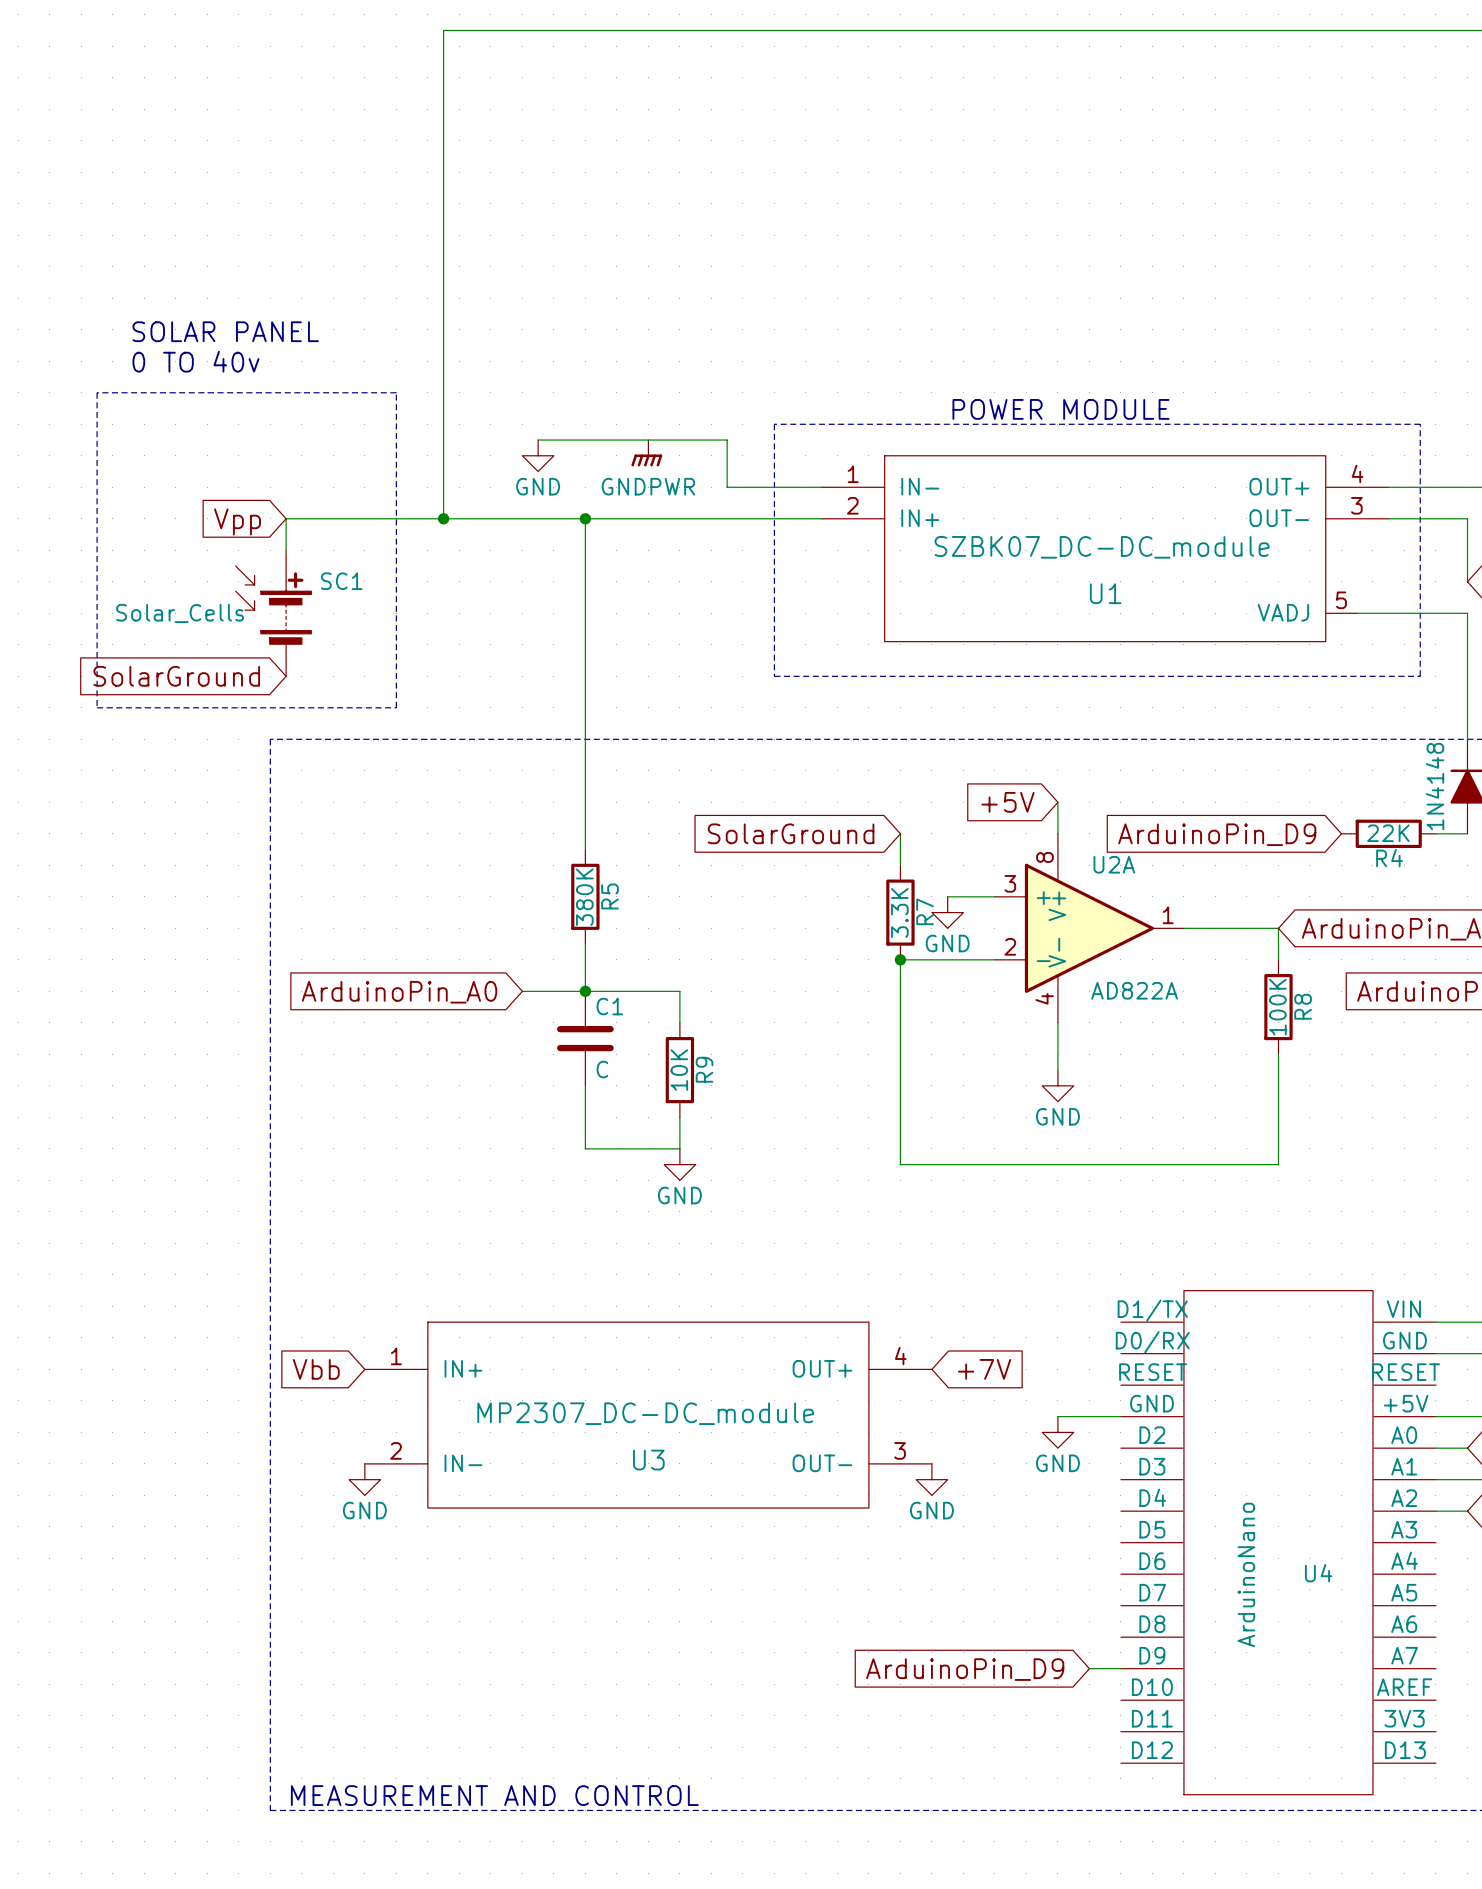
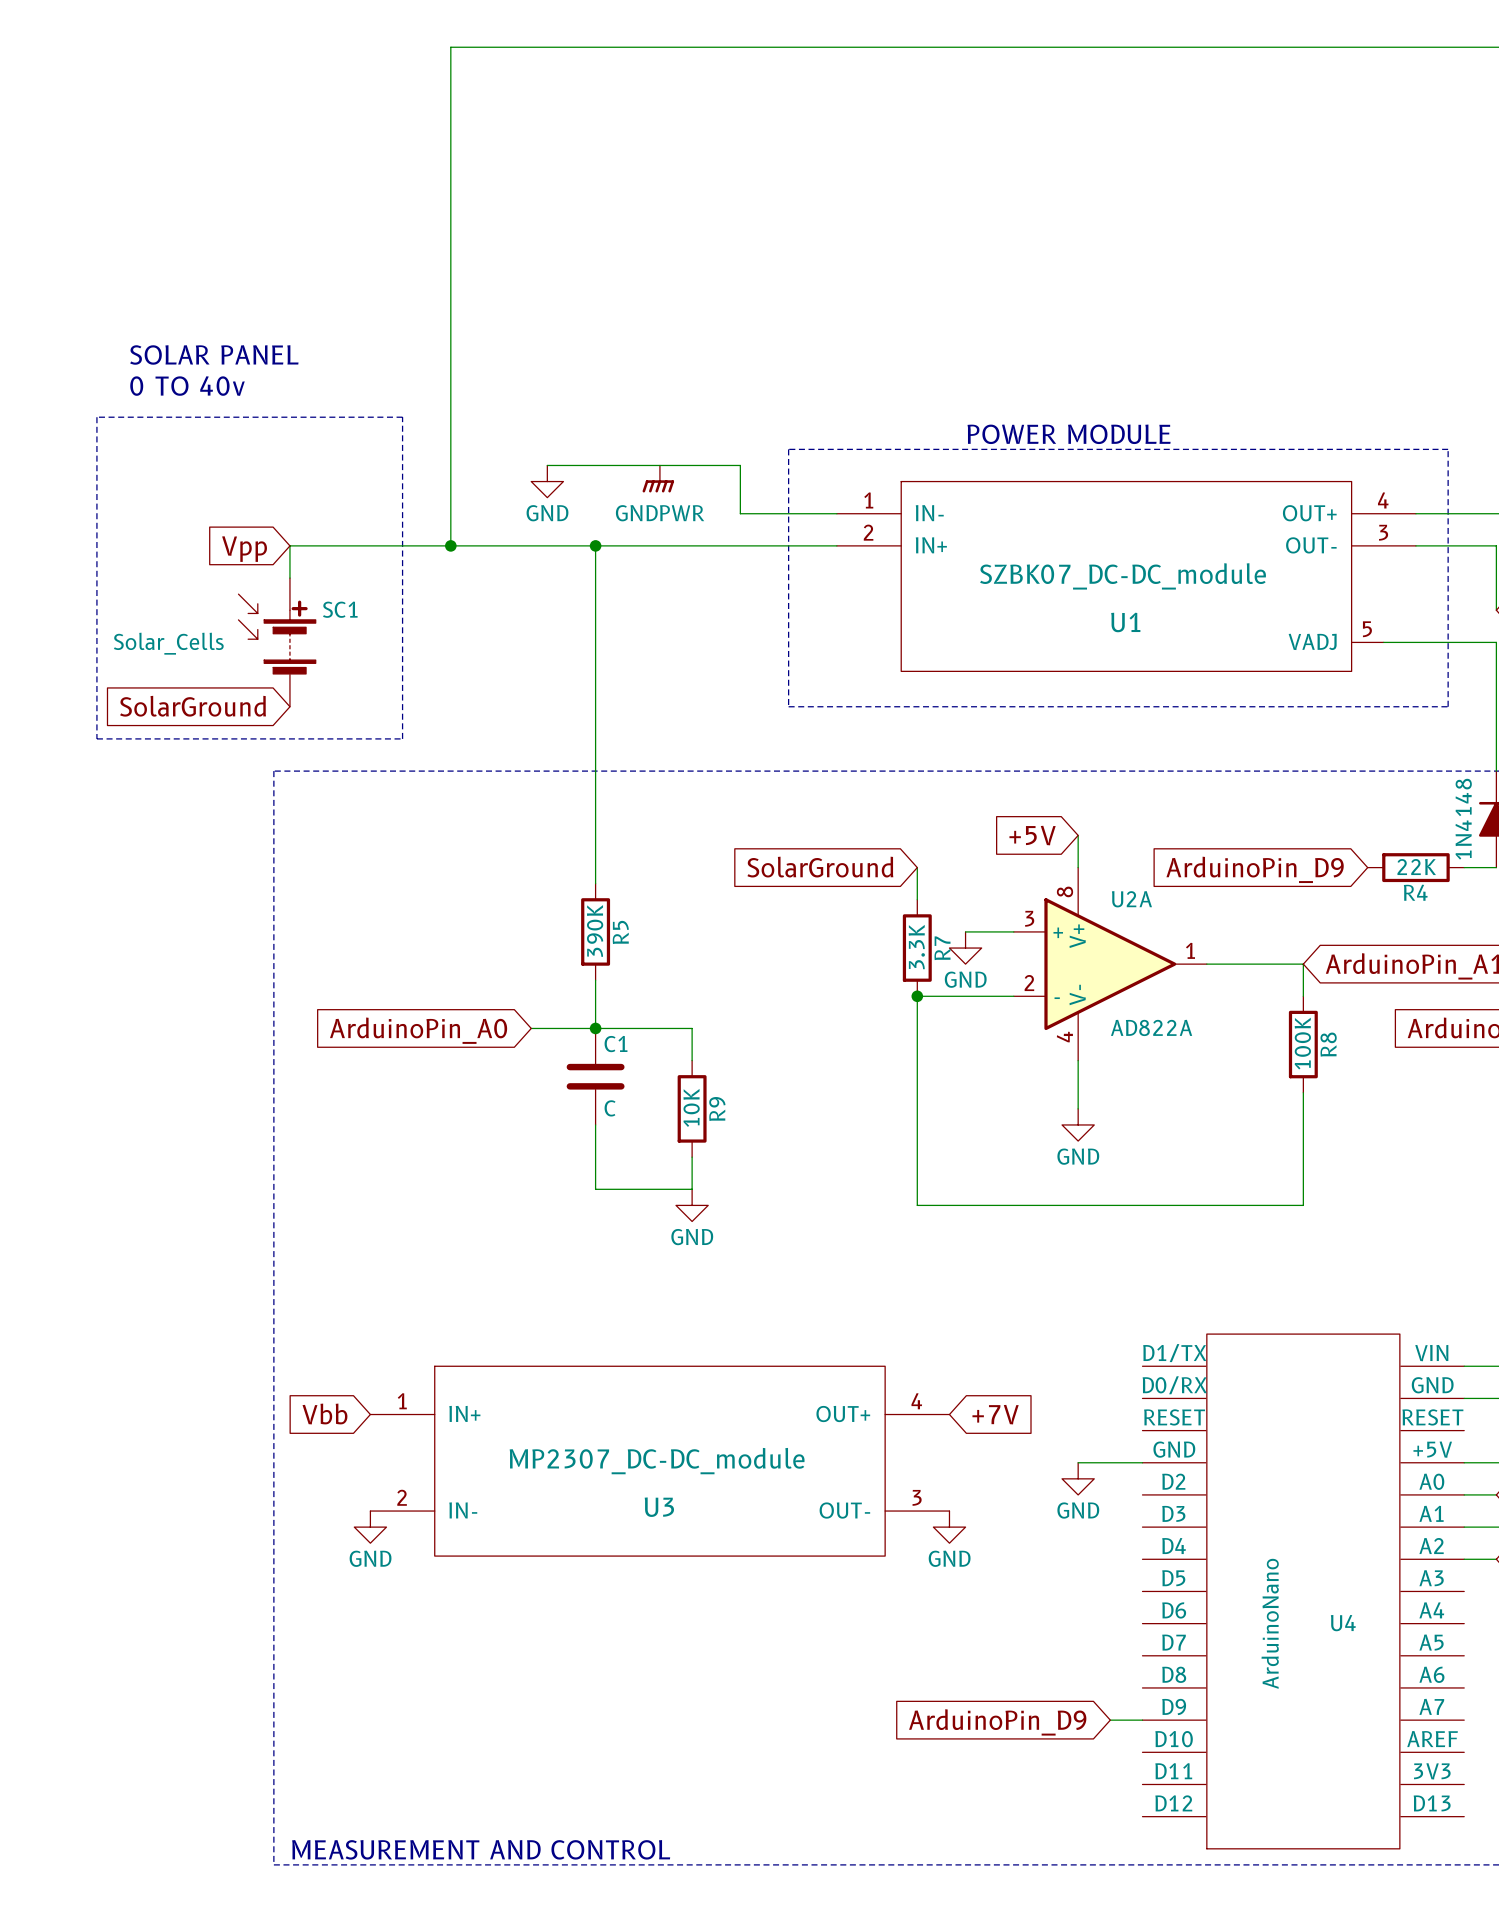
R5 value: 380K (584, 897) -> 390K (595, 930)

